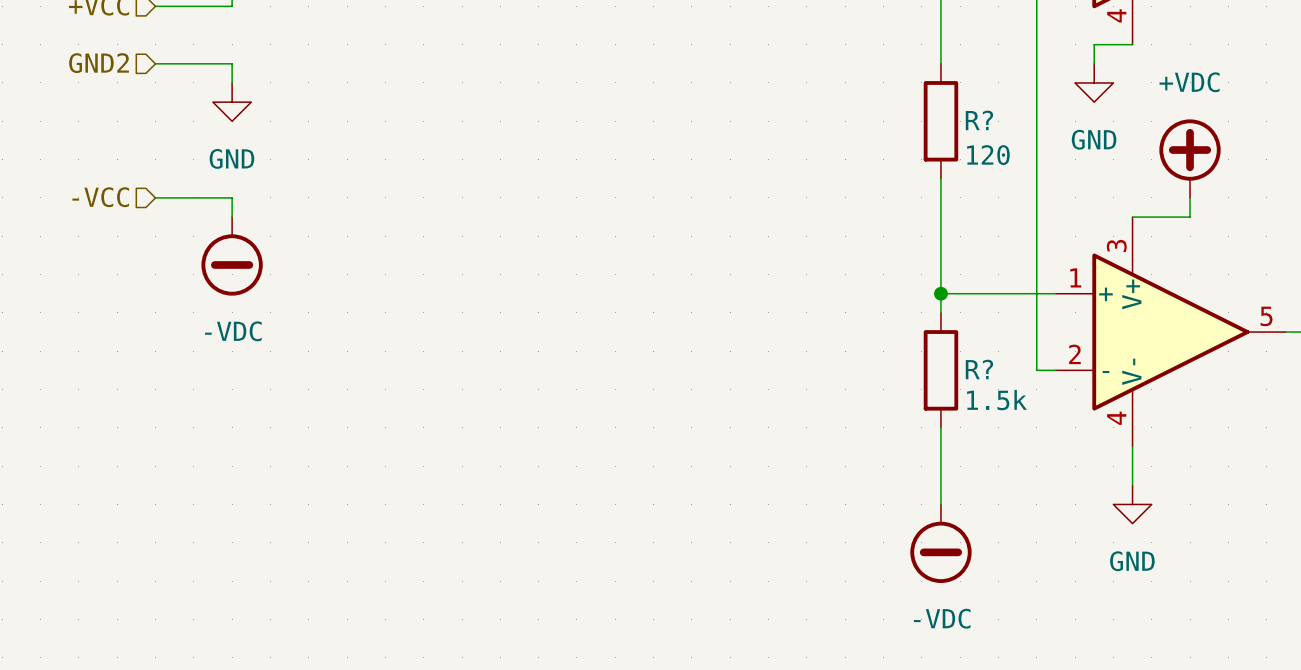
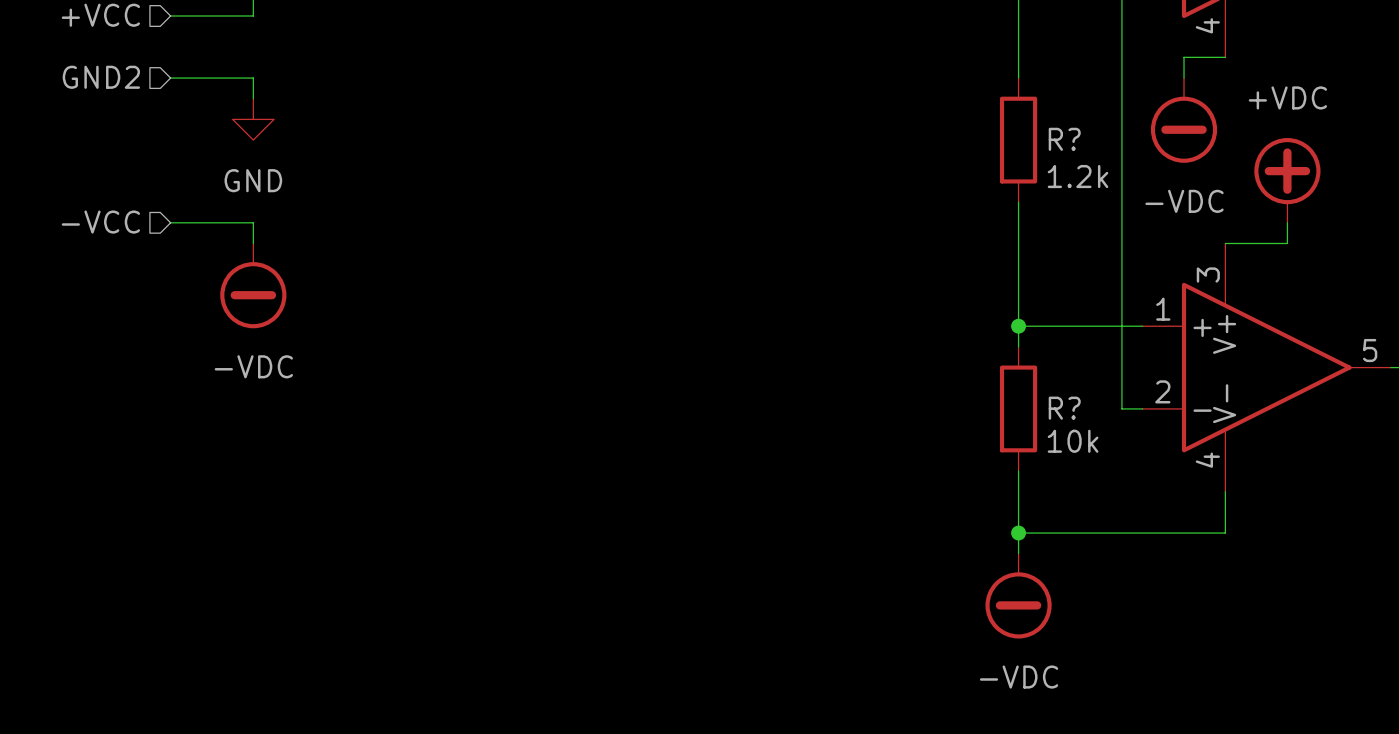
power symbol: GND (1094, 82) -> none
power symbol: none -> -VDC (1184, 120)
R? value: 120 (988, 155) -> 1.2k (1078, 176)
R? value: 1.5k (996, 400) -> 10k (1073, 441)
wire: none -> (1018, 533) (1225, 533)
junction: none -> (1018, 533)
power symbol: GND (1132, 504) -> none

